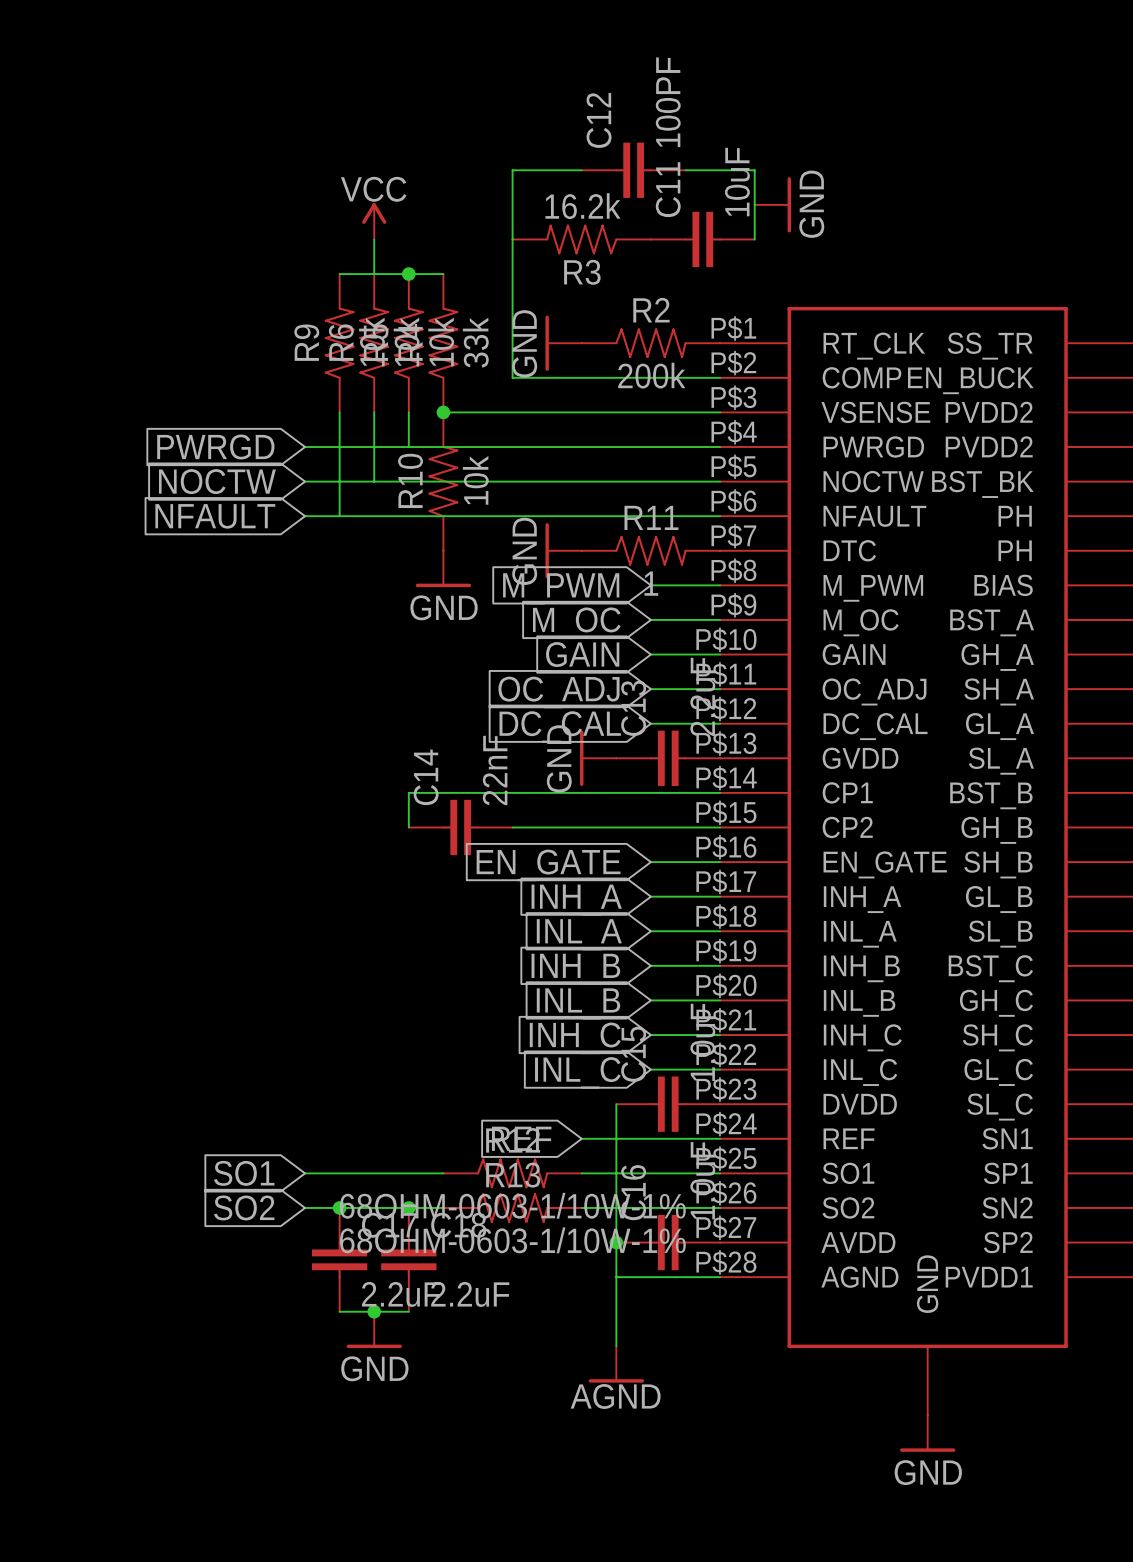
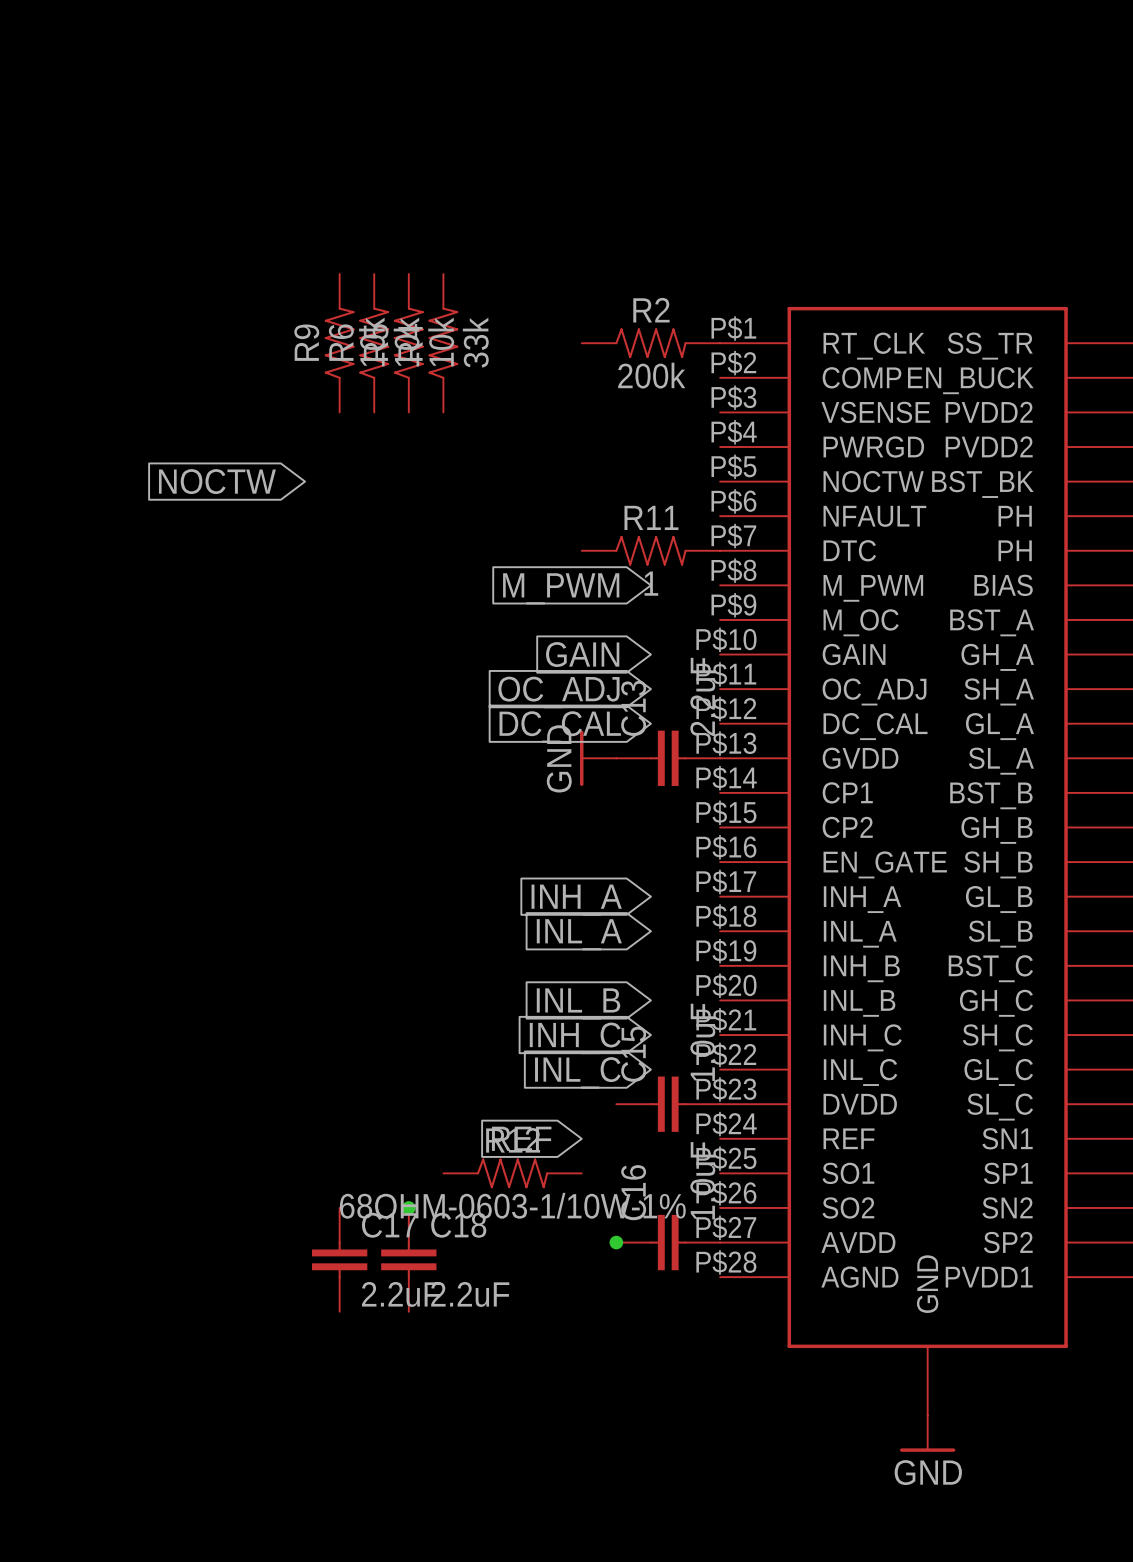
wire: (581, 170) (512, 170) (512, 377) (720, 377) -> none
C12: 100PF (633, 170) -> none
wire: (685, 170) (754, 170) (754, 239) -> none
power symbol: GND (772, 204) -> none
power symbol: VCC (374, 221) -> none
wire: (374, 239) (374, 274) -> none
R3: 16.2k (581, 239) -> none
C11: 10uF (702, 239) -> none
wire: (339, 274) (443, 274) -> none
junction: (408, 274) -> none
power symbol: GND (563, 343) -> none
wire: (339, 412) (339, 516) -> none
wire: (374, 412) (374, 481) -> none
wire: (408, 412) (408, 447) -> none
wire: (443, 412) (720, 412) -> none
junction: (443, 412) -> none
global label: PWRGD (215, 446) -> none
wire: (305, 447) (720, 447) -> none
wire: (305, 481) (720, 481) -> none
R10: 10k (443, 481) -> none
global label: NFAULT (215, 516) -> none
wire: (305, 516) (720, 516) -> none
power symbol: GND (563, 550) -> none
power symbol: GND (443, 568) -> none
wire: (650, 585) (720, 585) -> none
wire: (650, 619) (720, 619) -> none
global label: M_OC (576, 623) -> none
wire: (650, 654) (720, 654) -> none
wire: (650, 689) (720, 689) -> none
wire: (650, 723) (720, 723) -> none
wire: (720, 792) (408, 792) (408, 827) -> none
C14: 22nF (460, 827) -> none
wire: (512, 827) (720, 827) -> none
wire: (650, 862) (720, 862) -> none
global label: EN_GATE (548, 865) -> none
wire: (650, 896) (720, 896) -> none
wire: (650, 931) (720, 931) -> none
wire: (650, 965) (720, 965) -> none
global label: INH_B (575, 969) -> none
wire: (650, 1000) (720, 1000) -> none
wire: (650, 1035) (720, 1035) -> none
wire: (650, 1069) (720, 1069) -> none
wire: (616, 1104) (616, 1346) -> none
wire: (581, 1138) (720, 1138) -> none
global label: SO1 (244, 1173) -> none
wire: (305, 1173) (443, 1173) -> none
wire: (581, 1173) (720, 1173) -> none
global label: SO2 (244, 1207) -> none
wire: (305, 1207) (443, 1207) -> none
junction: (339, 1207) -> none
R13: 68OHM-0603-1/10W-1% (512, 1207) -> none
wire: (581, 1207) (720, 1207) -> none
wire: (616, 1277) (720, 1277) -> none
wire: (339, 1311) (408, 1311) -> none
junction: (374, 1311) -> none
power symbol: GND (374, 1329) -> none
power symbol: AGND (616, 1364) -> none

